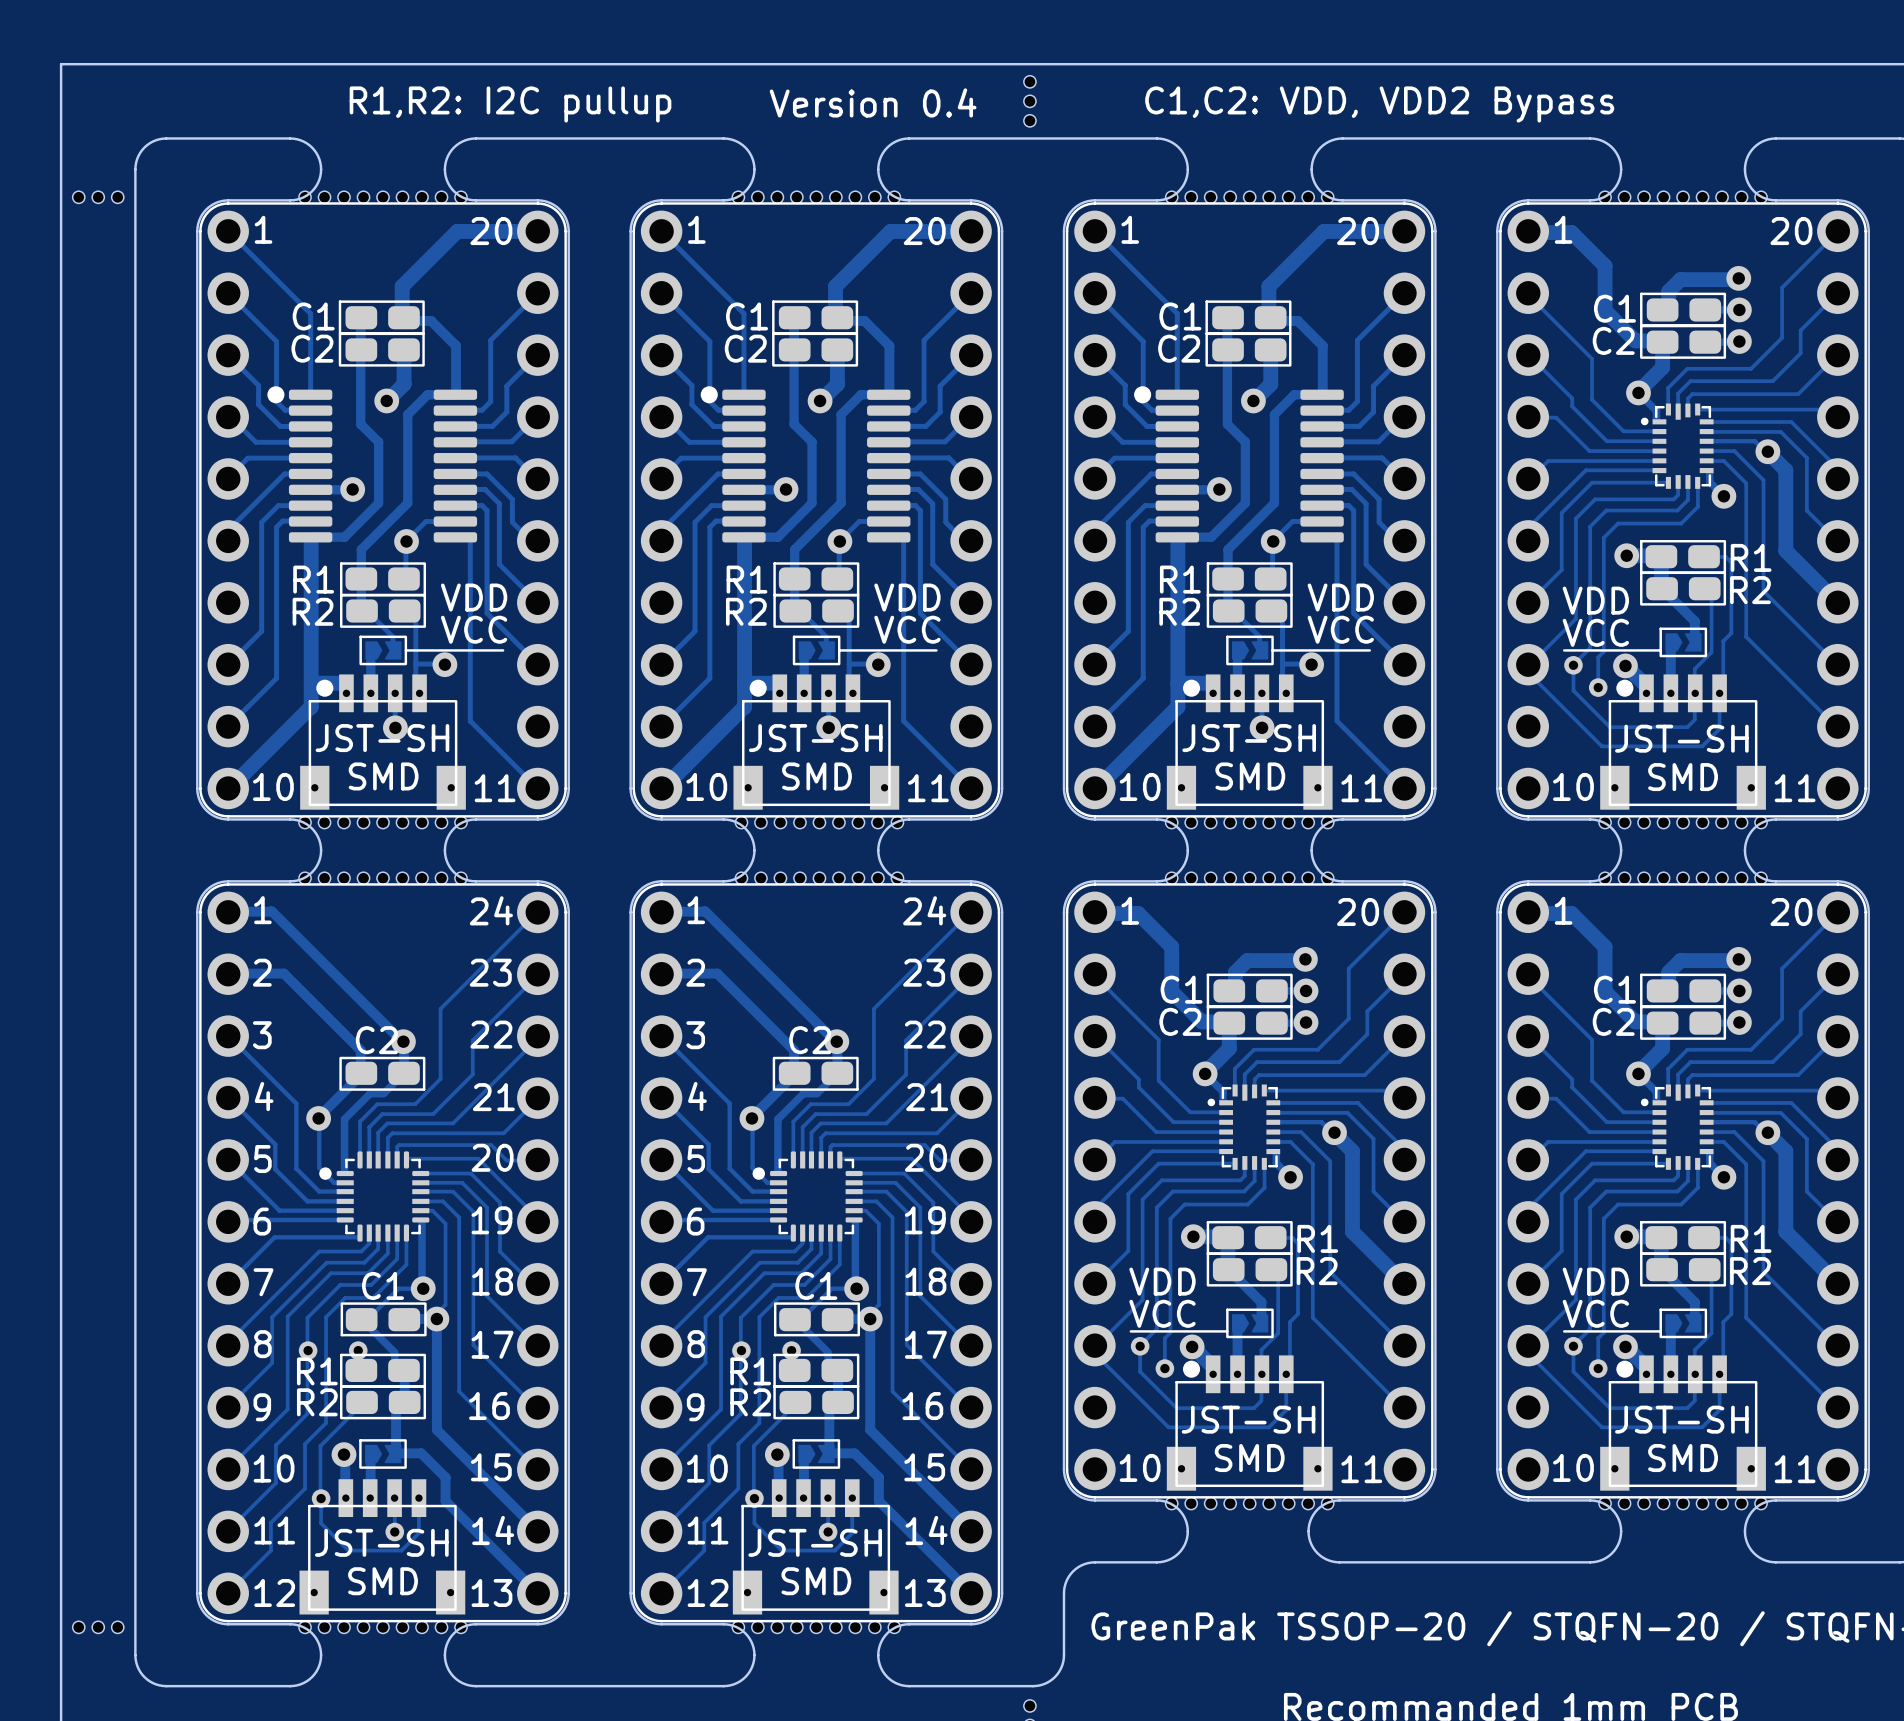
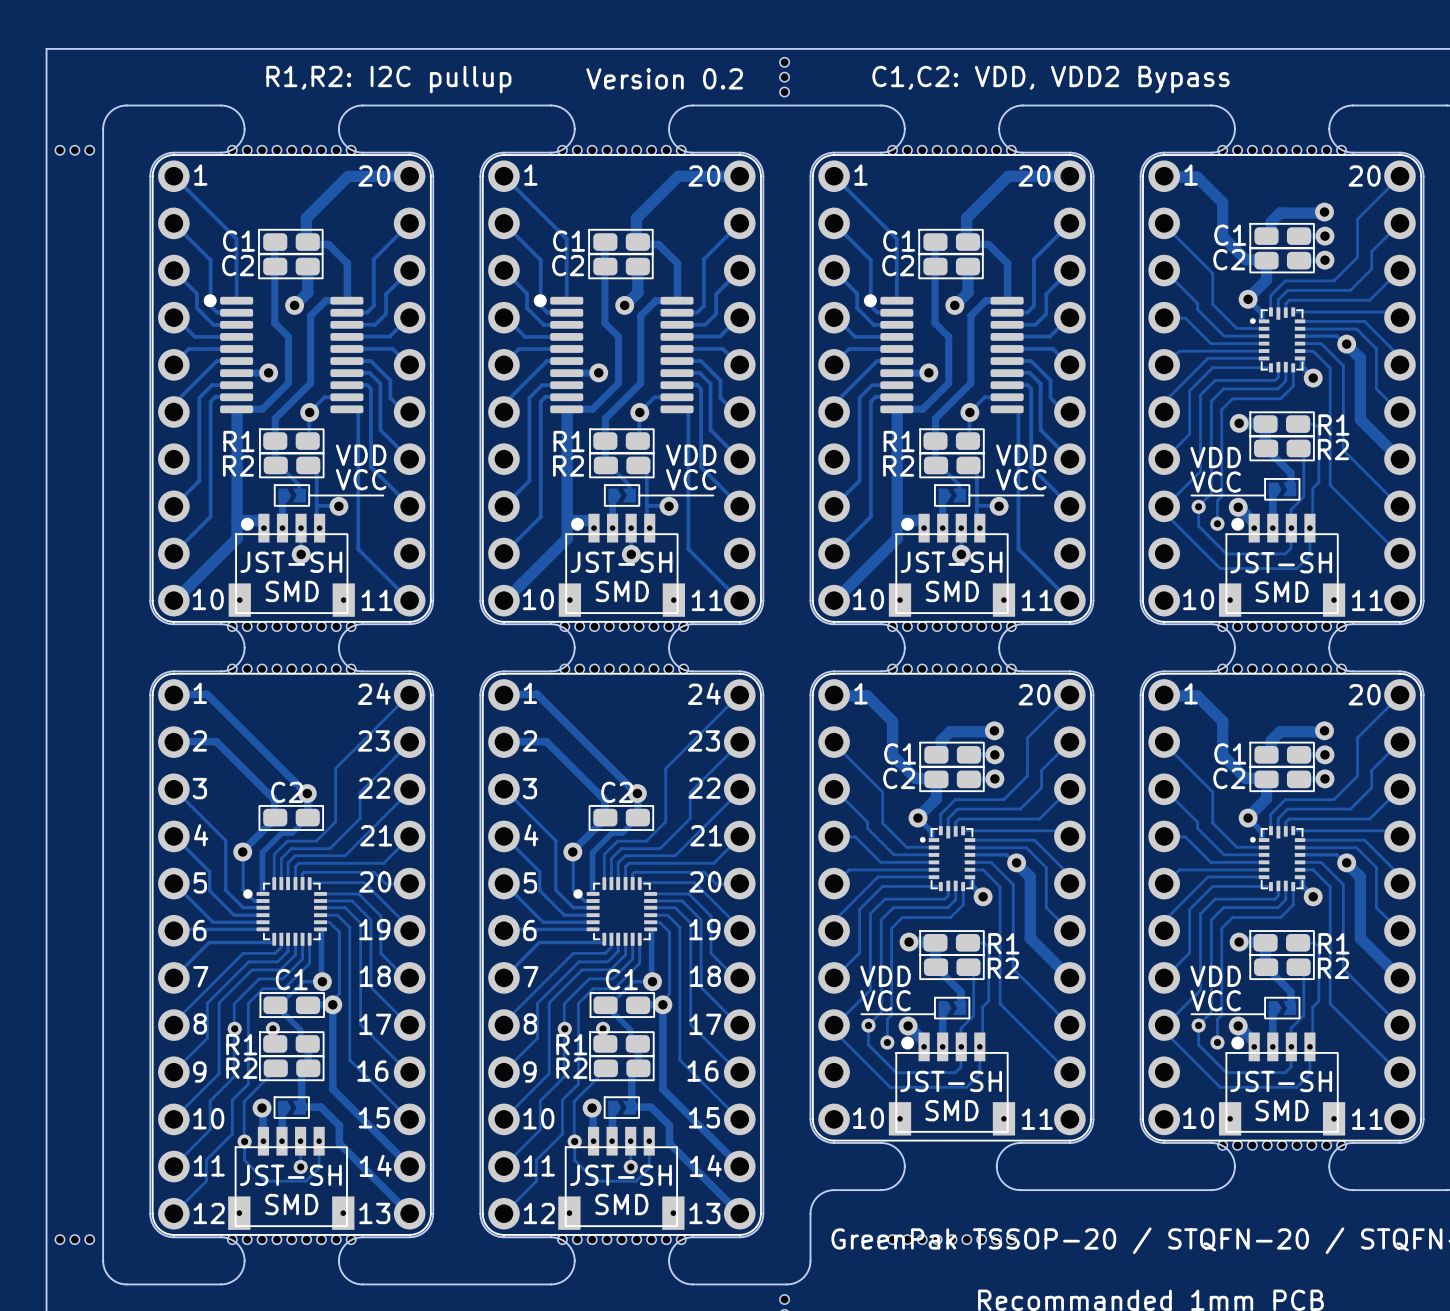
text: Version 0.4 (873, 102) -> Version 0.2 (664, 78)
part position: (1249, 1503) -> (951, 1239)

